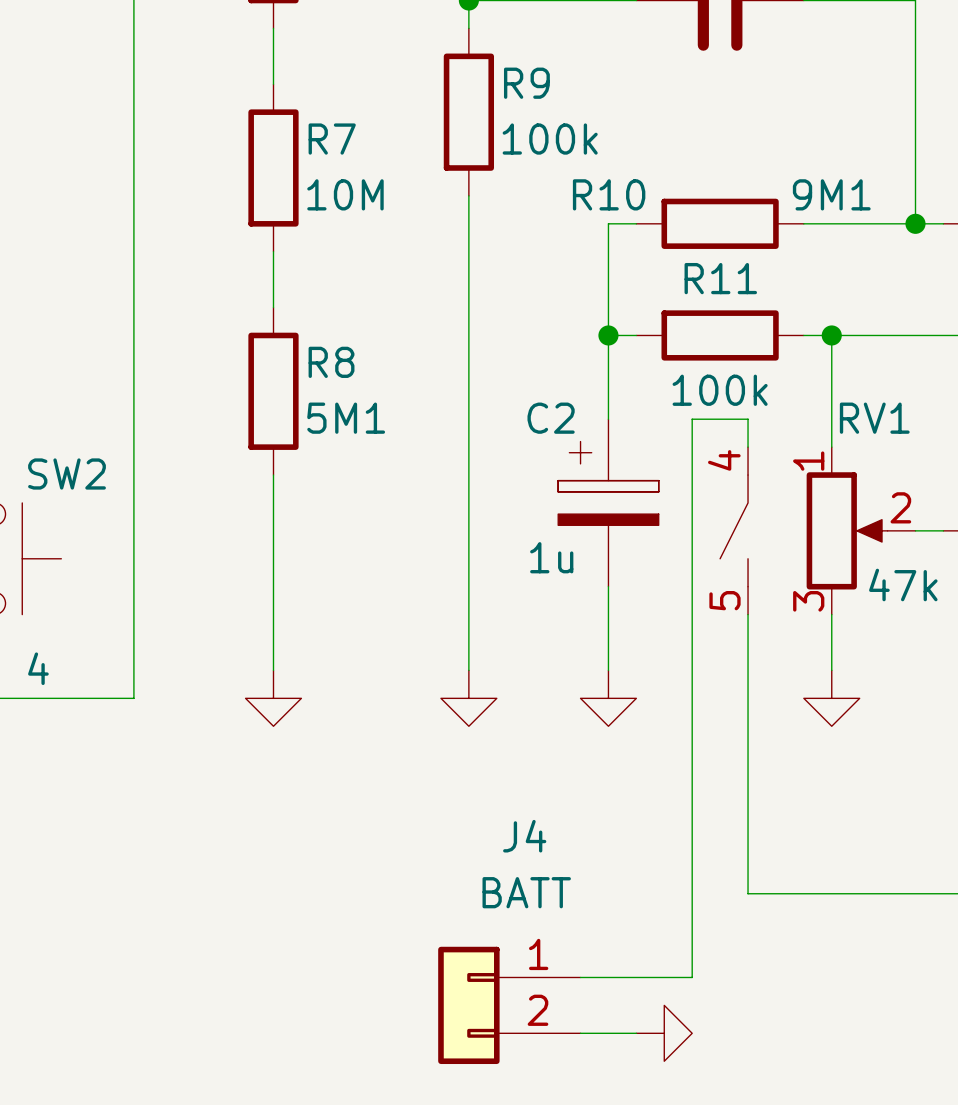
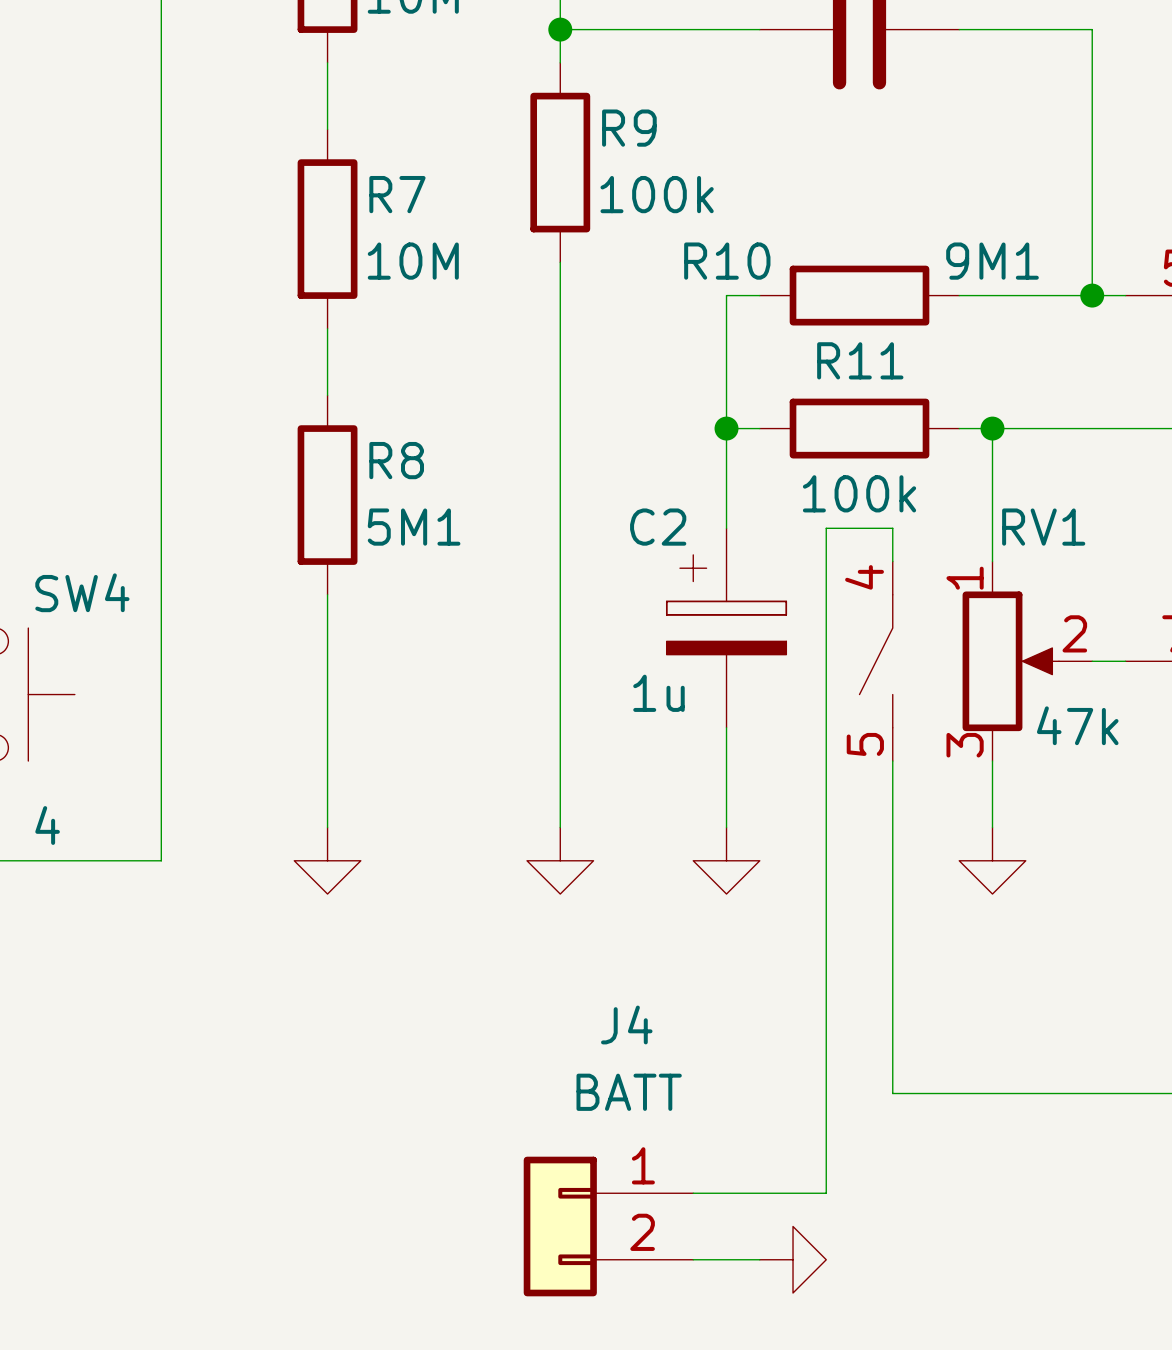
SW2 name: SW2 (67, 474) -> SW4 (82, 592)

